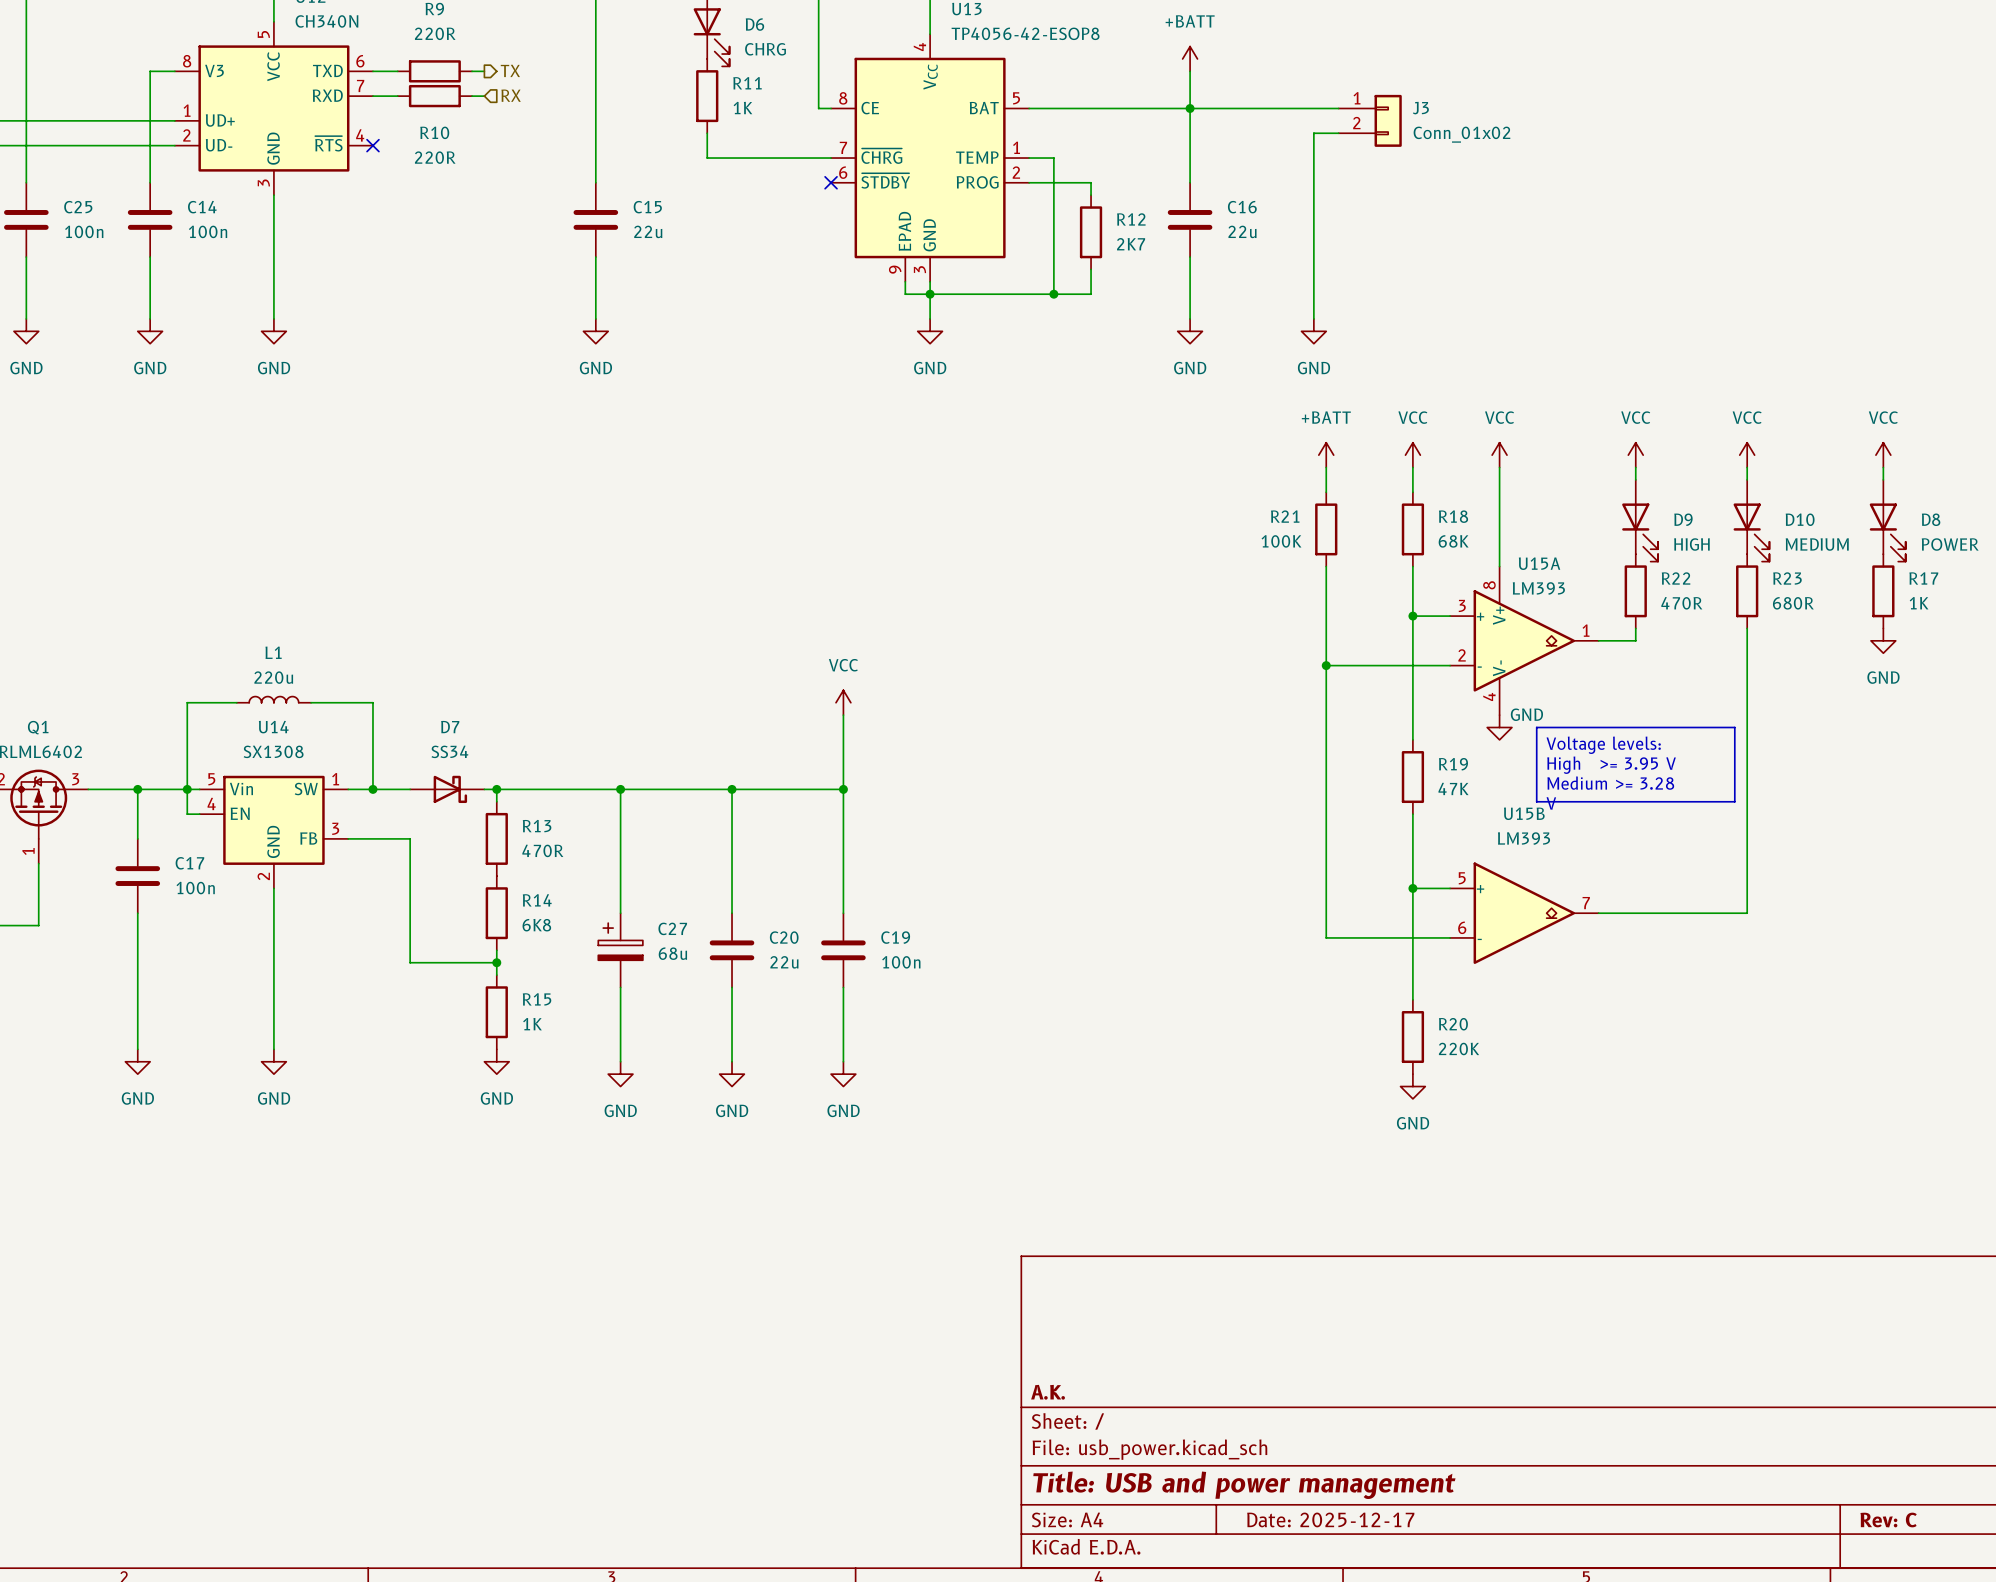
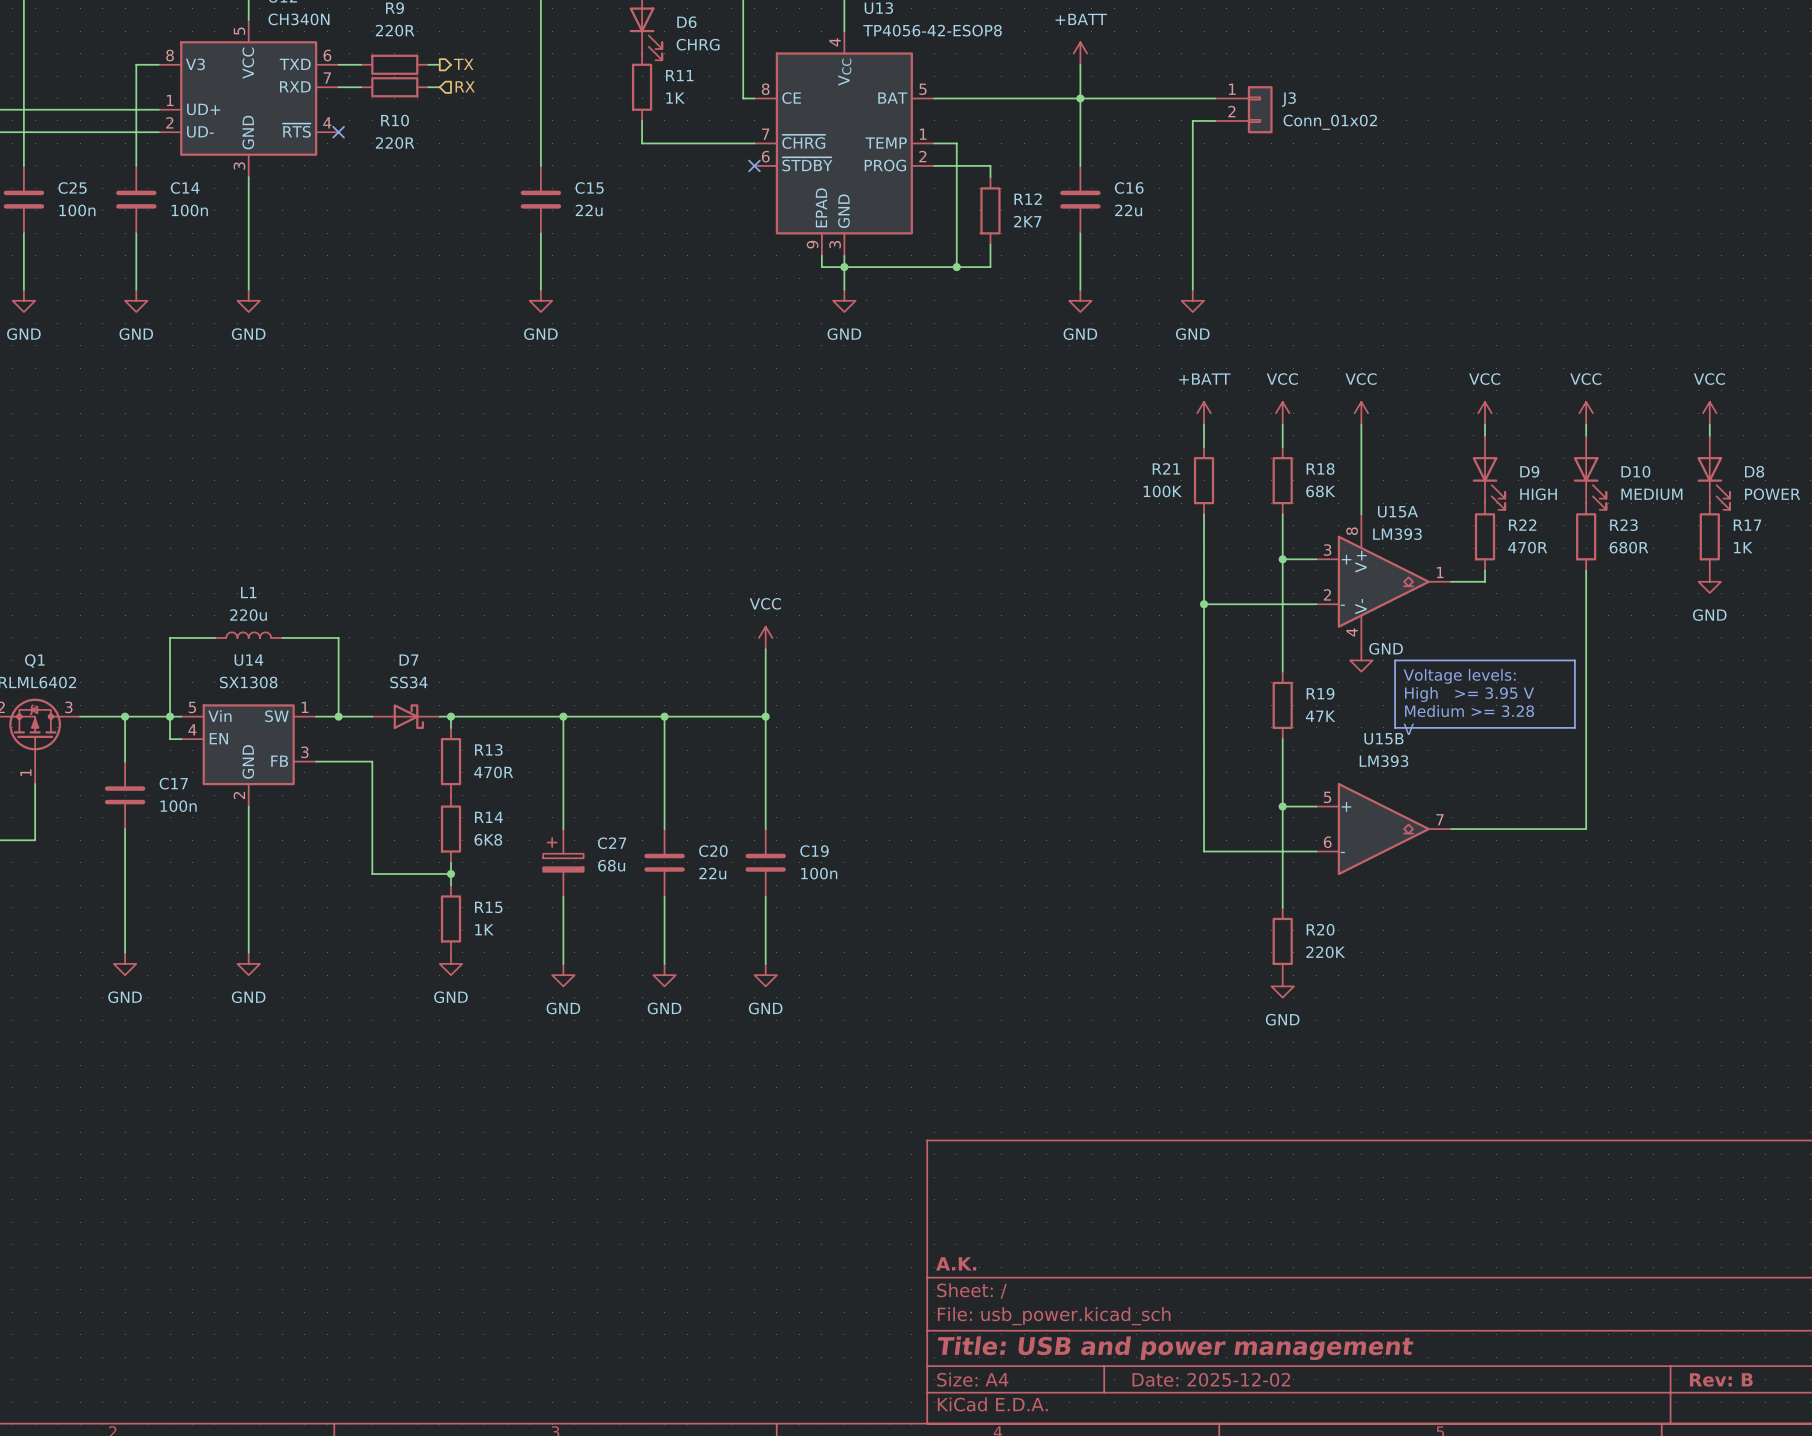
title block: Date: 2025-12-17 (1330, 1519) -> Date: 2025-12-02 (1211, 1379)
title block: Rev: C (1888, 1520) -> Rev: B (1721, 1379)

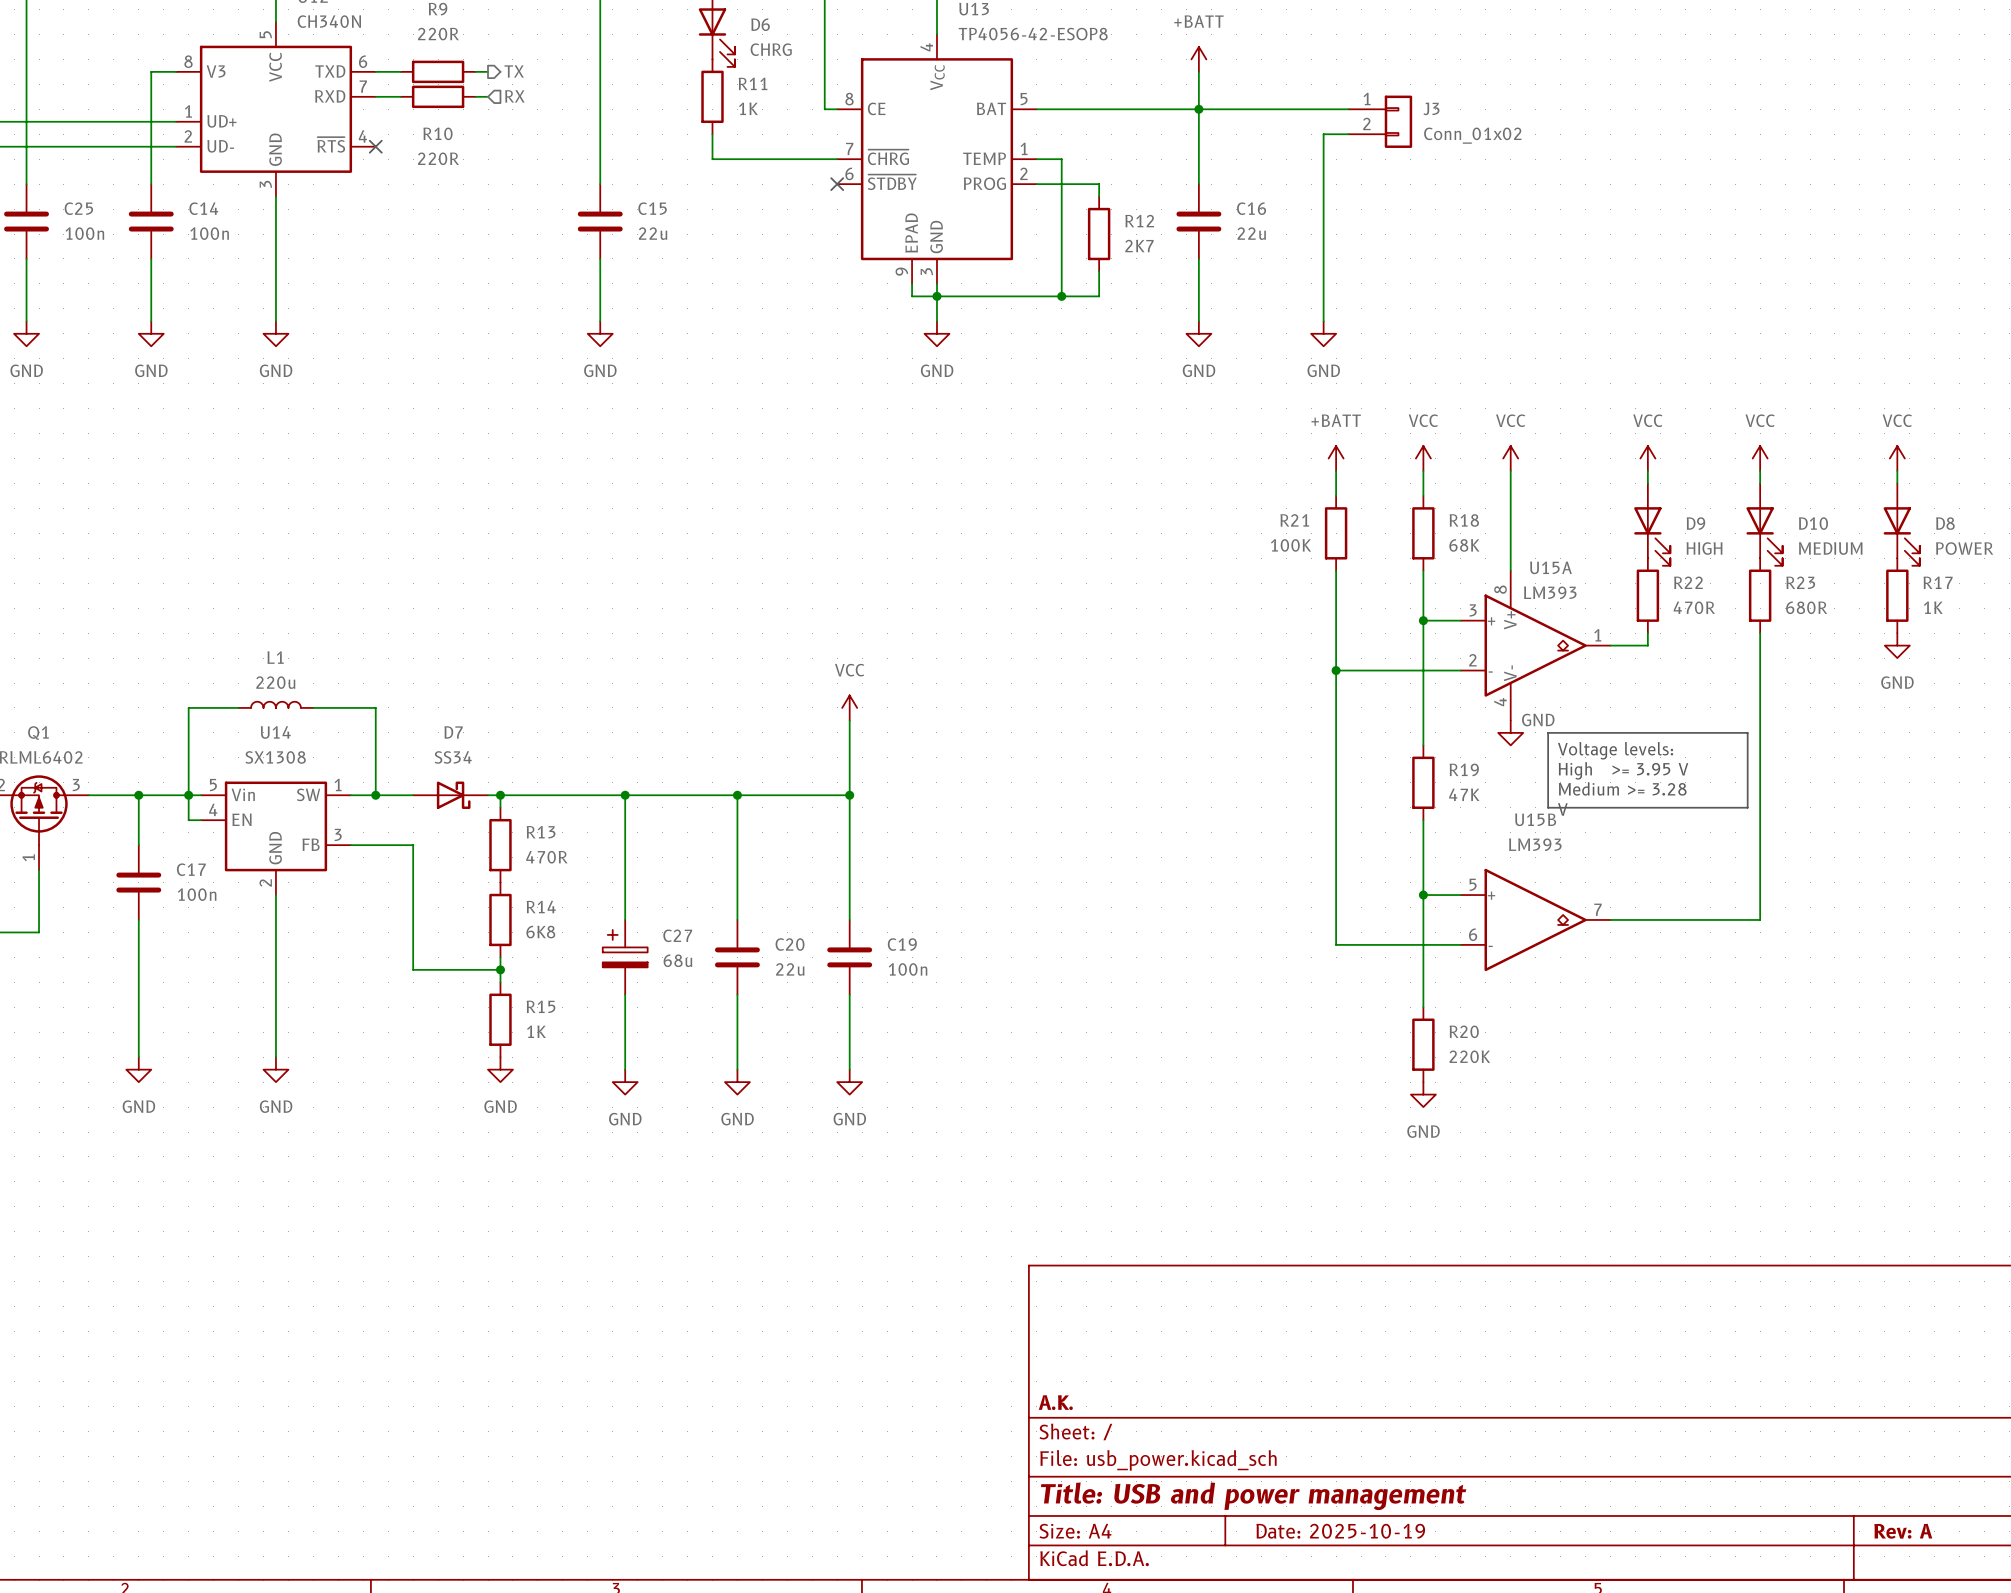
title block: Date: 2025-12-02 (1211, 1379) -> Date: 2025-10-19 (1340, 1531)
title block: Rev: B (1721, 1379) -> Rev: A (1903, 1531)

